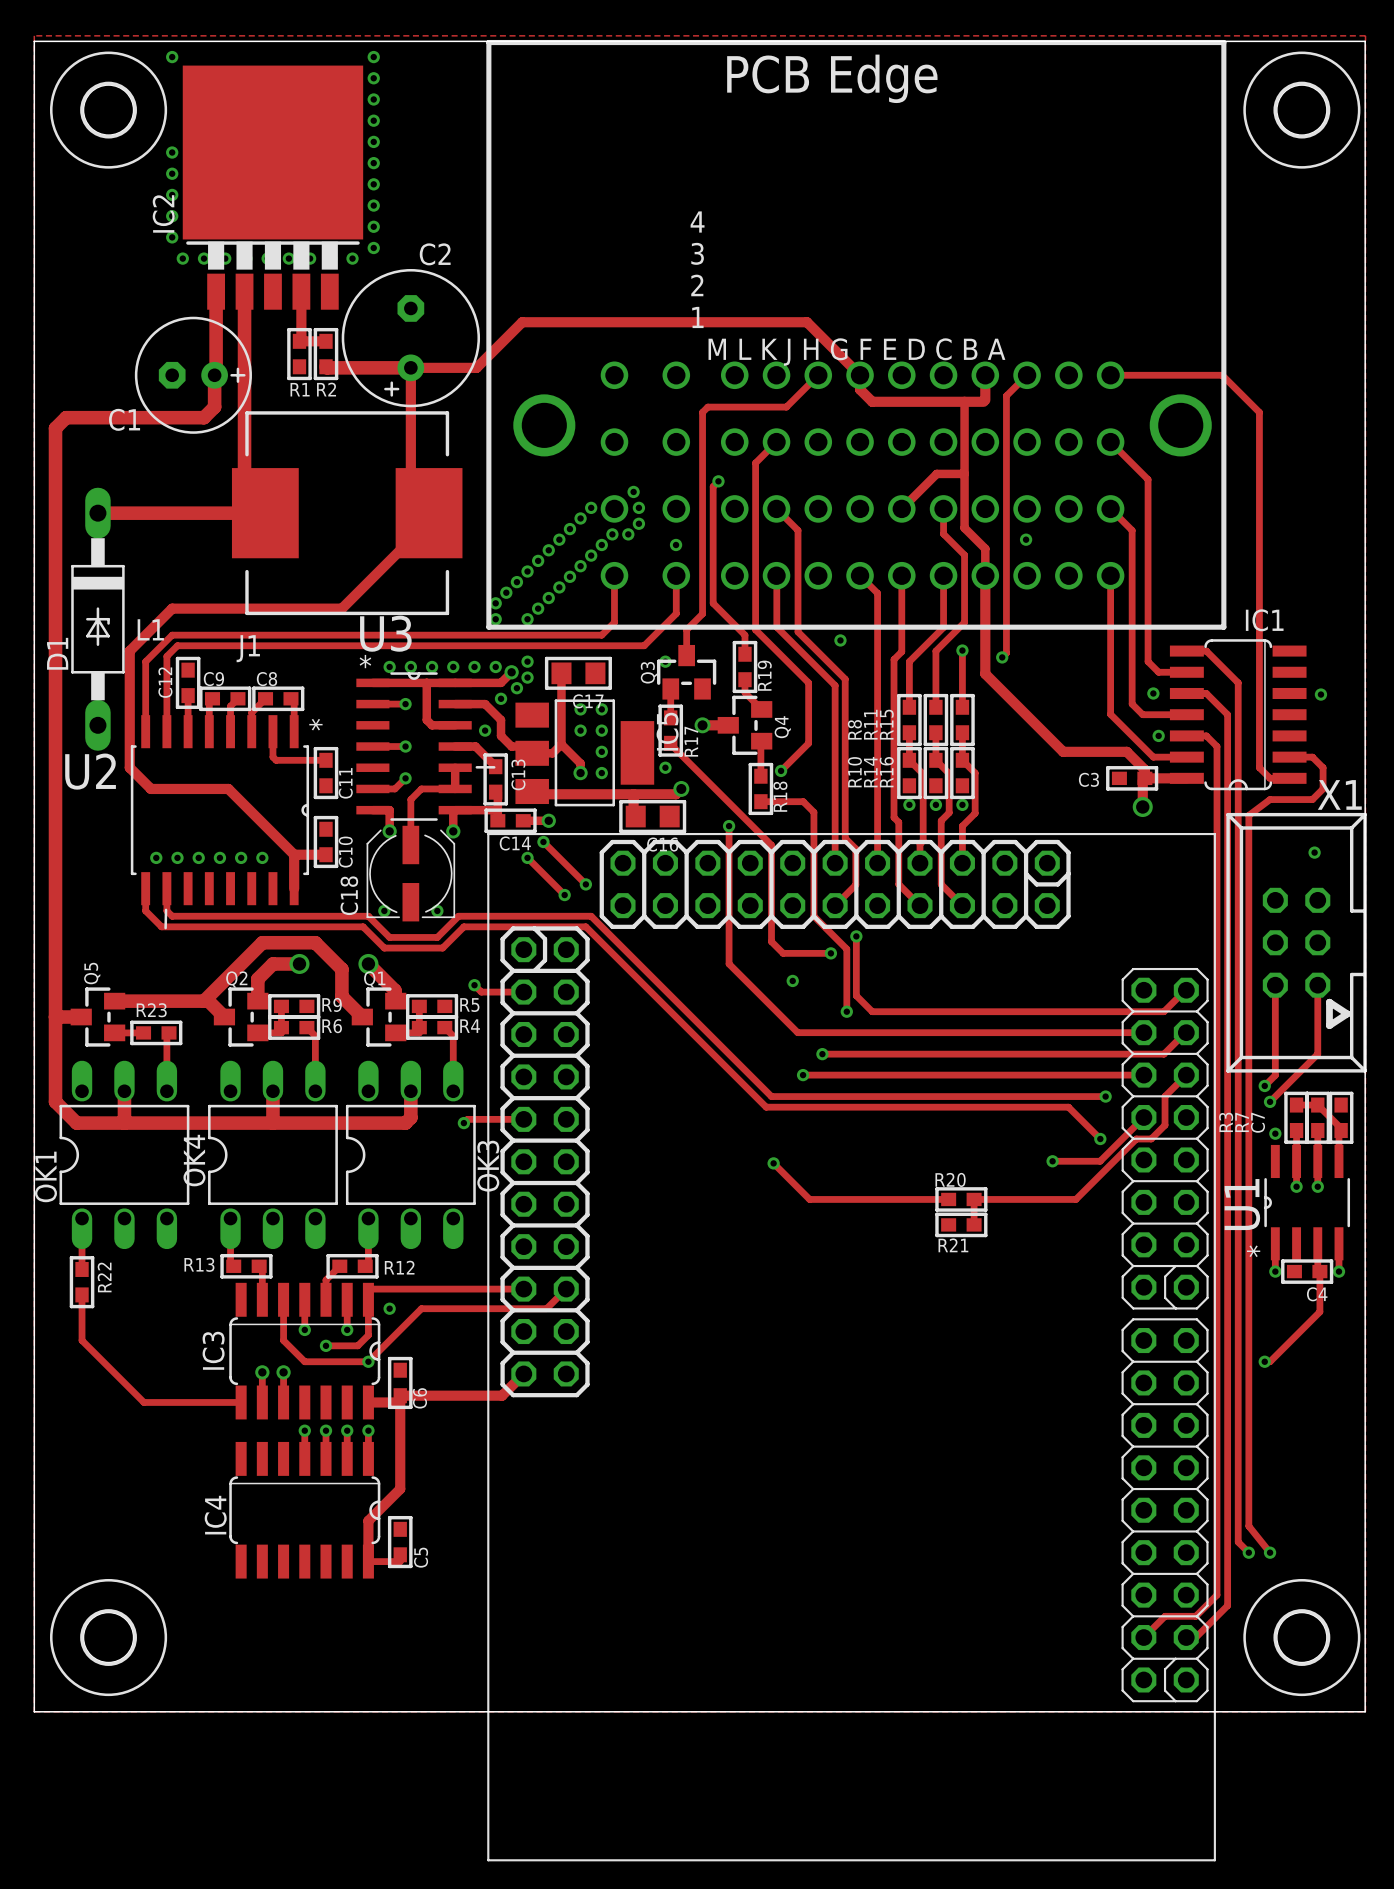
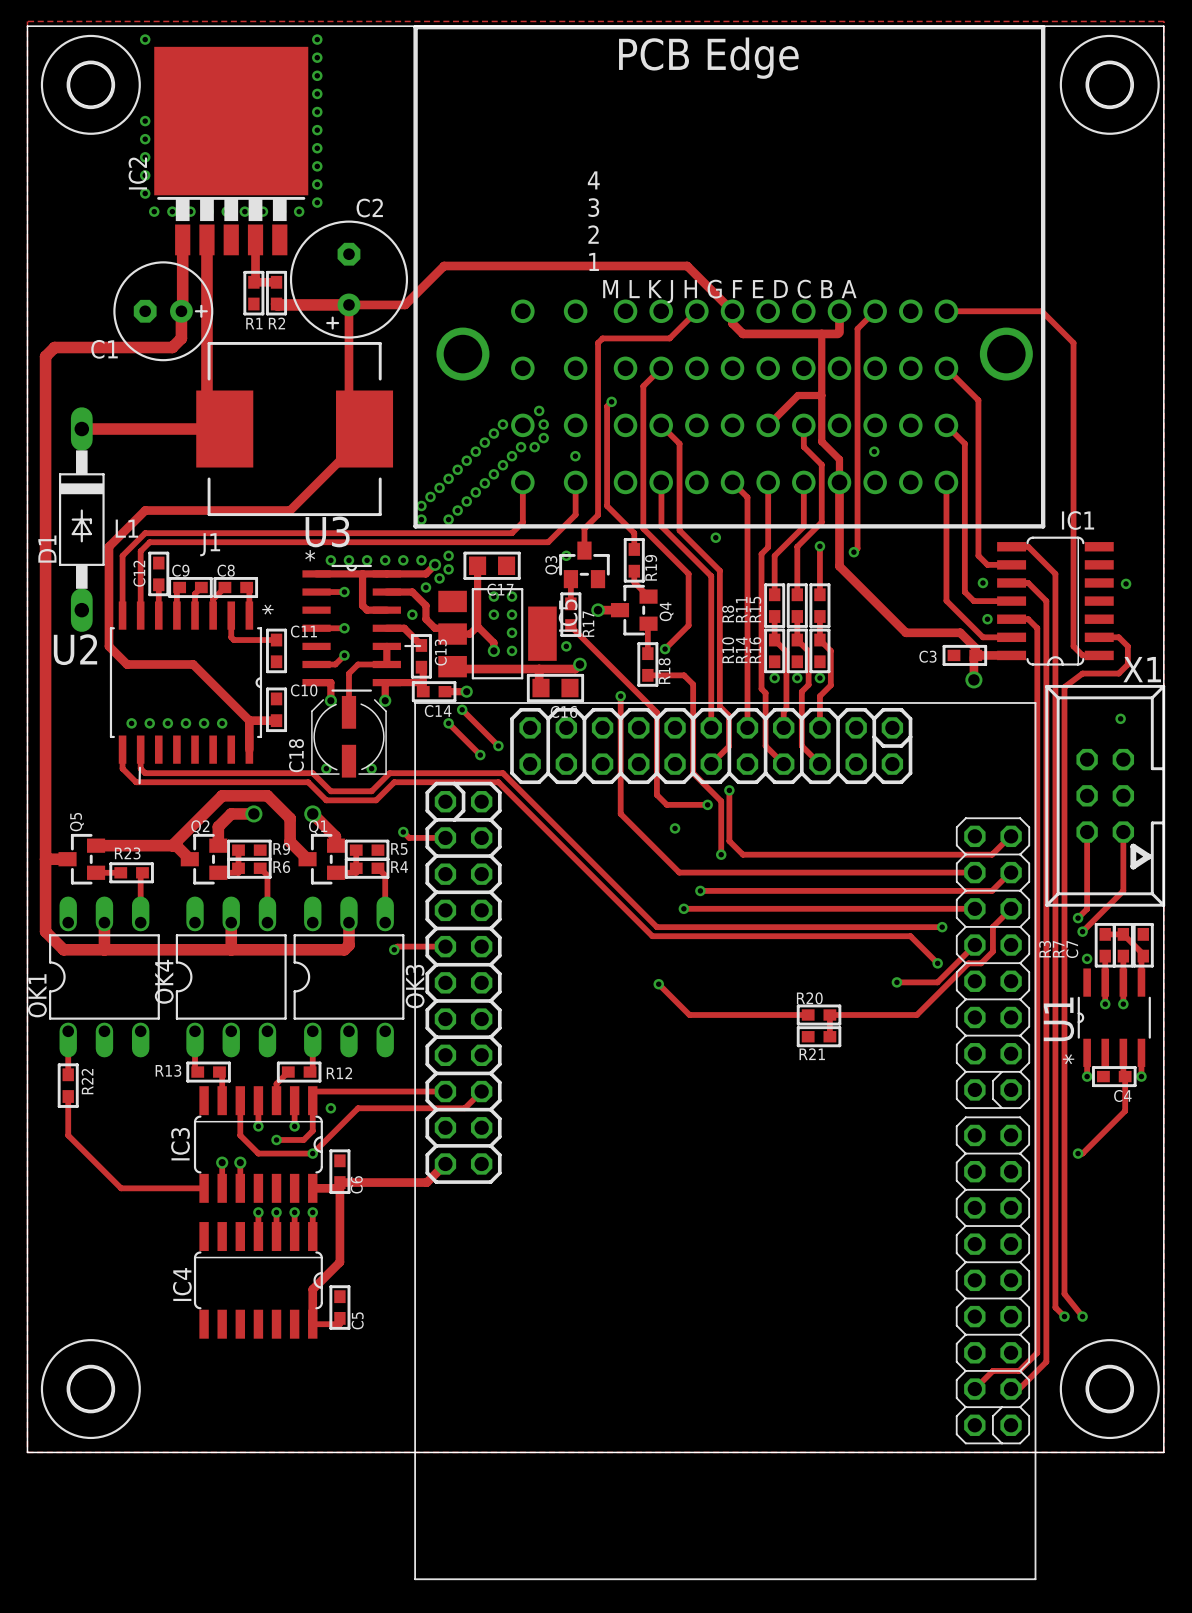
C11 name rotation: 0° (345, 783) -> 90° clockwise (303, 631)
C10 name rotation: 0° (345, 852) -> 90° clockwise (304, 690)

